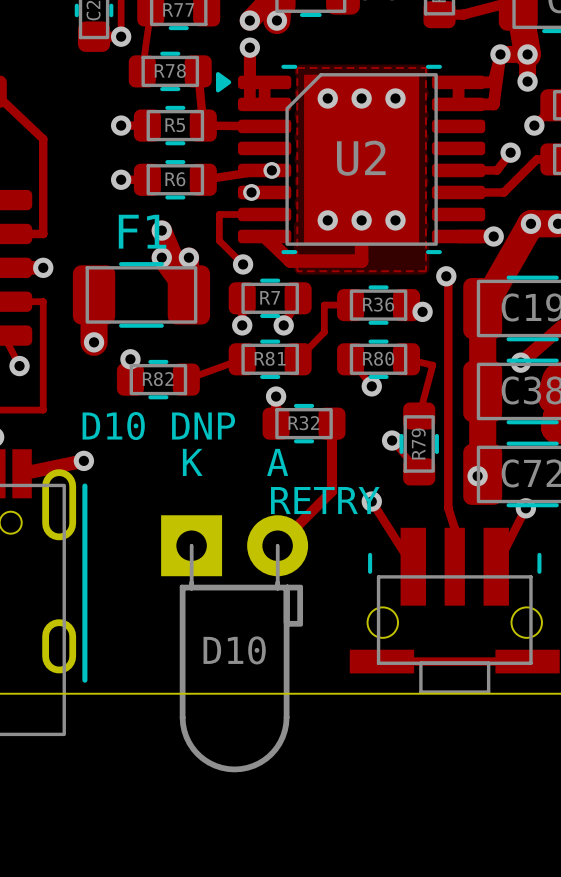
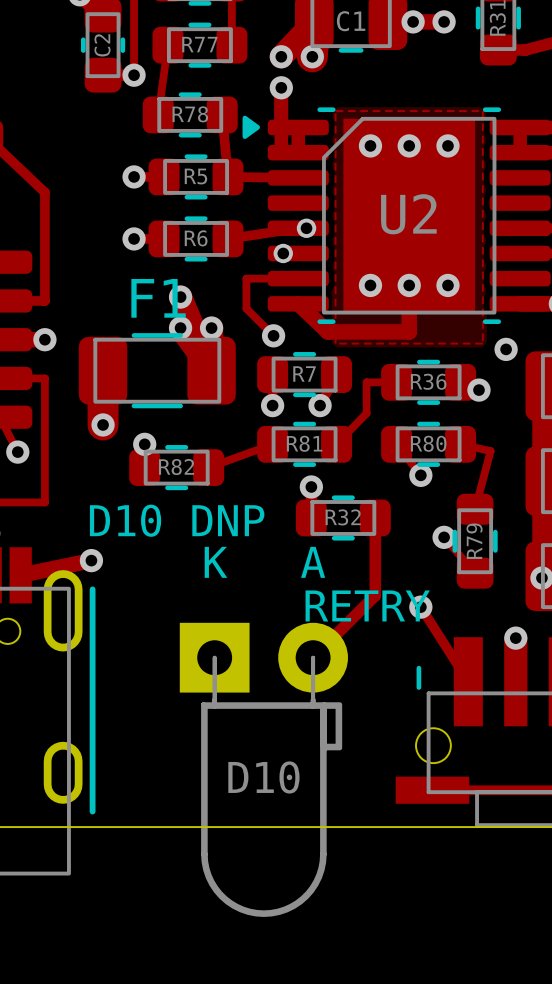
track: (446, 276) (448, 281) (448, 508) (454, 528) -> none
via: none -> (515, 638)

